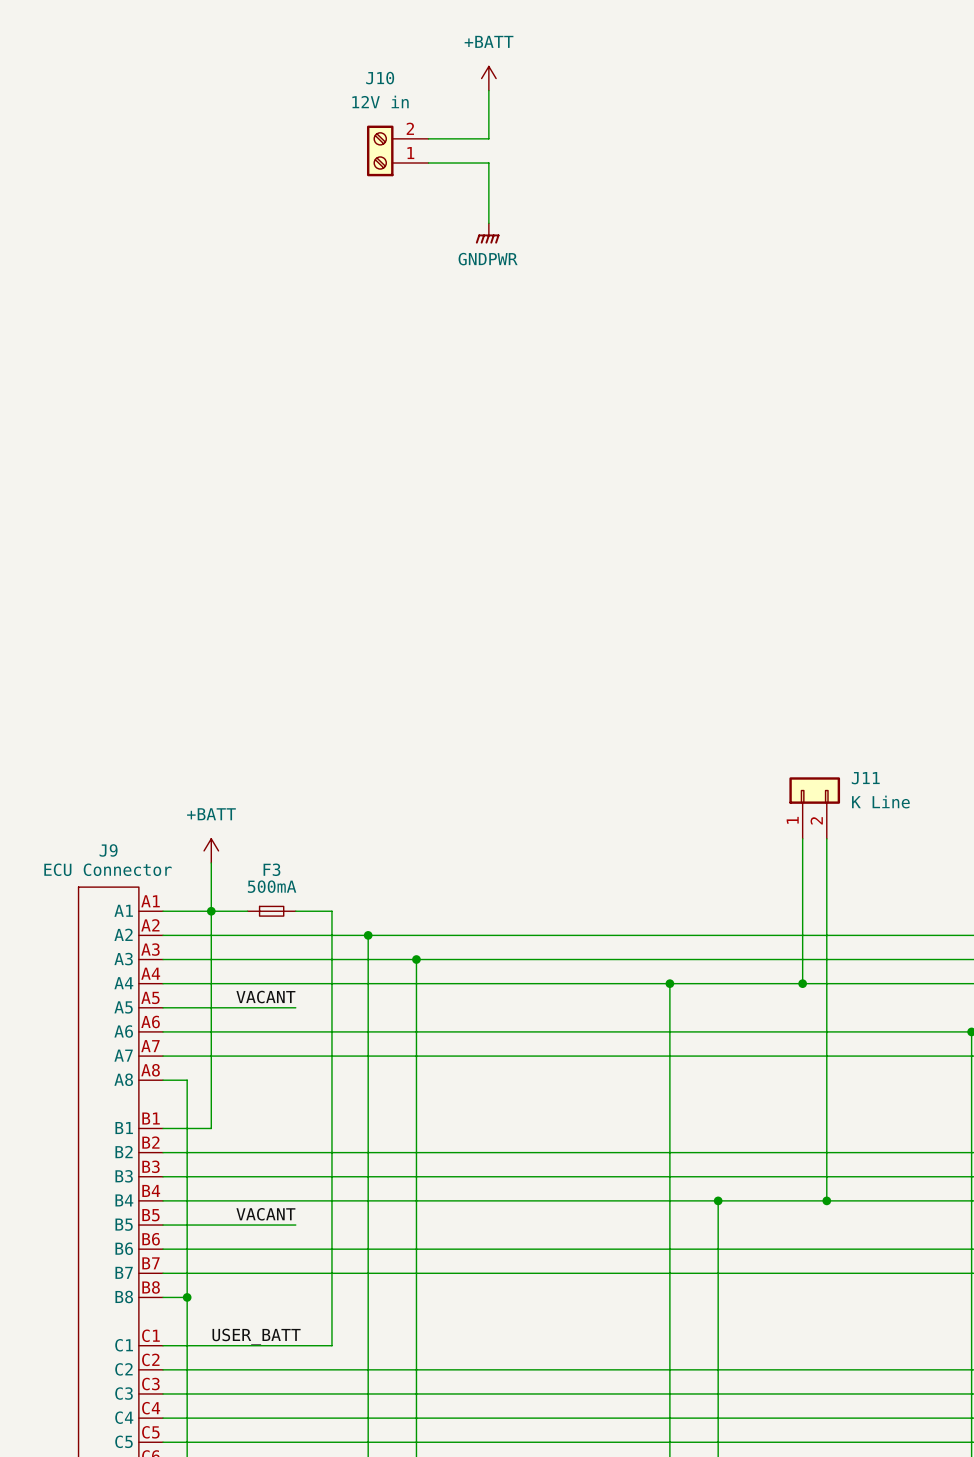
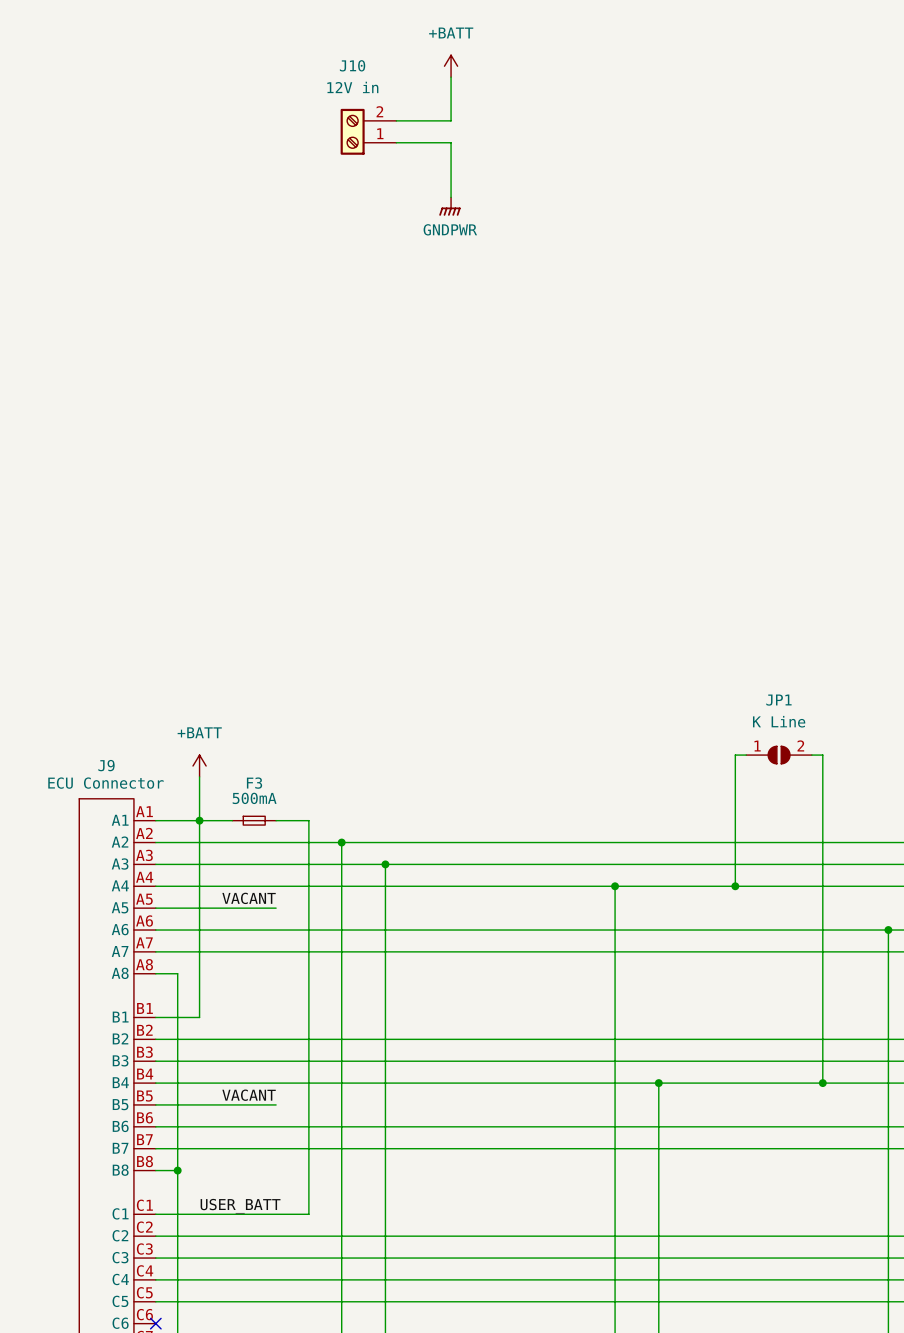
J11: K Line (814, 808) -> none
wire: none -> (735, 755) (746, 755)
wire: (826, 838) (826, 1200) -> none
JP1: none -> K Line (779, 755)
wire: none -> (811, 755) (822, 755) (822, 1083)
junction: (826, 1200) -> none
junction: none -> (822, 1083)

